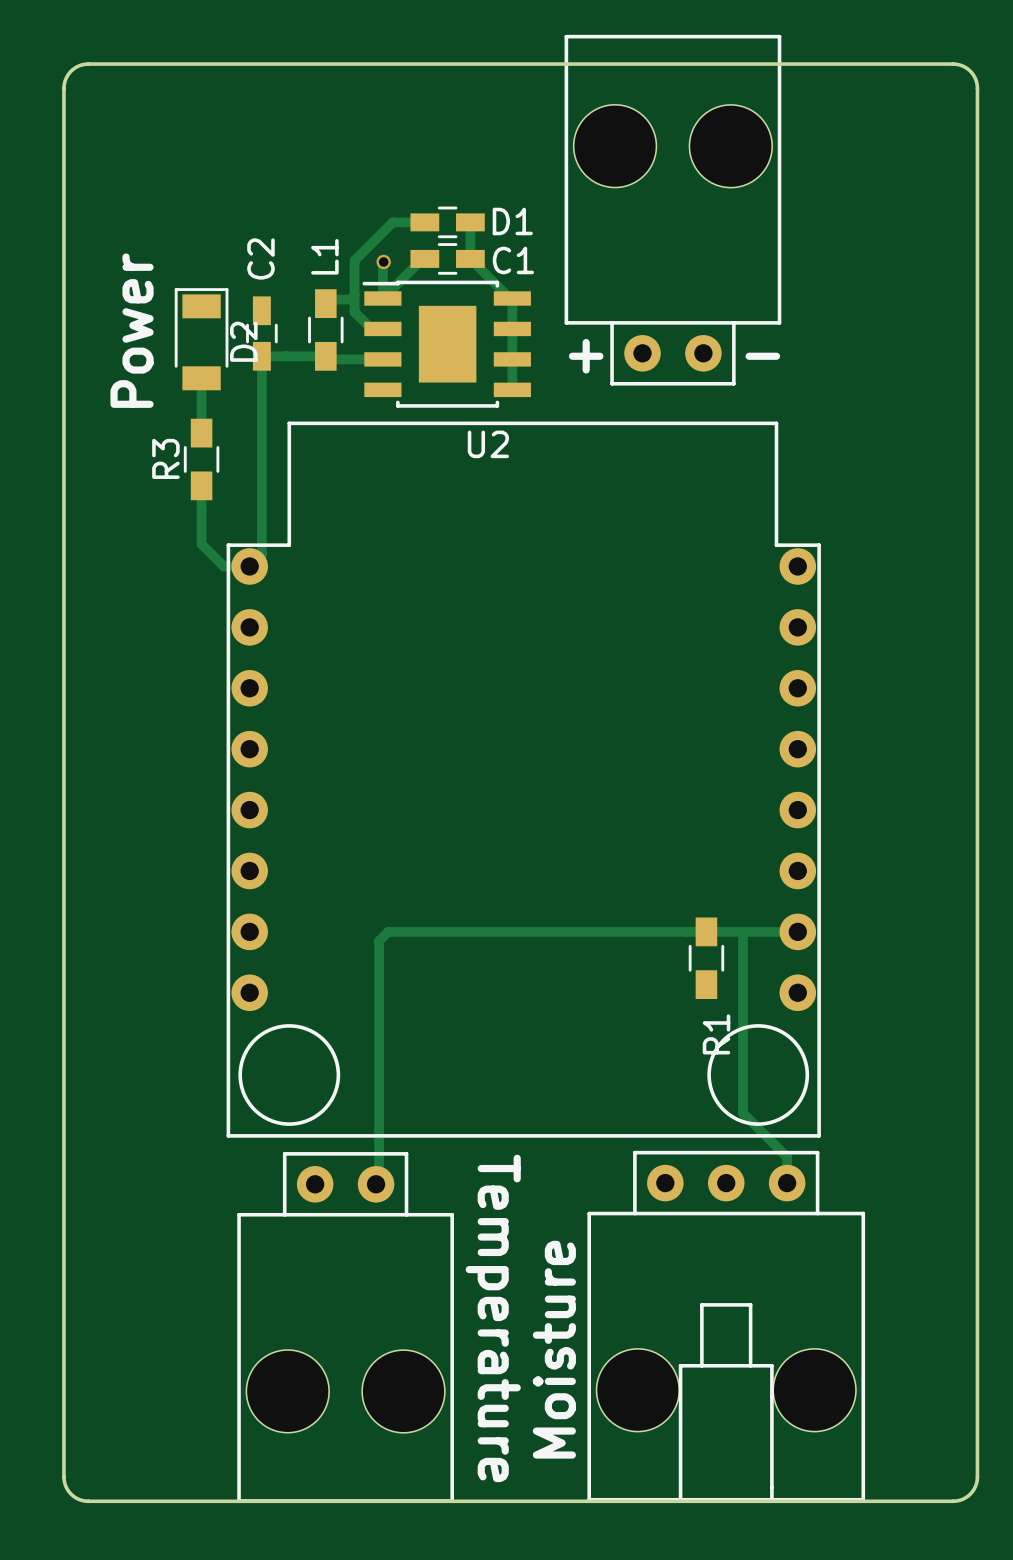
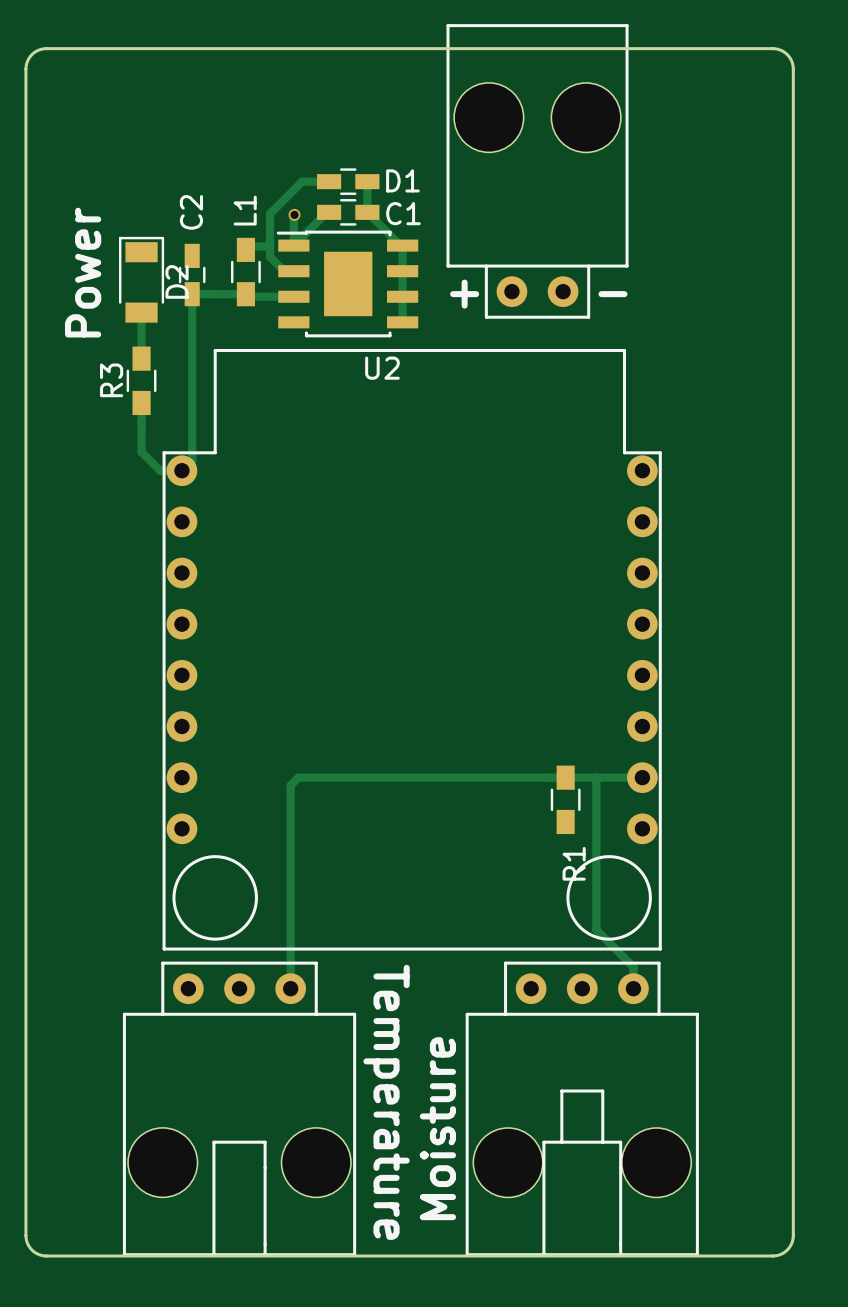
part: none -> (239, 1108)
part: (345, 1327) -> none

